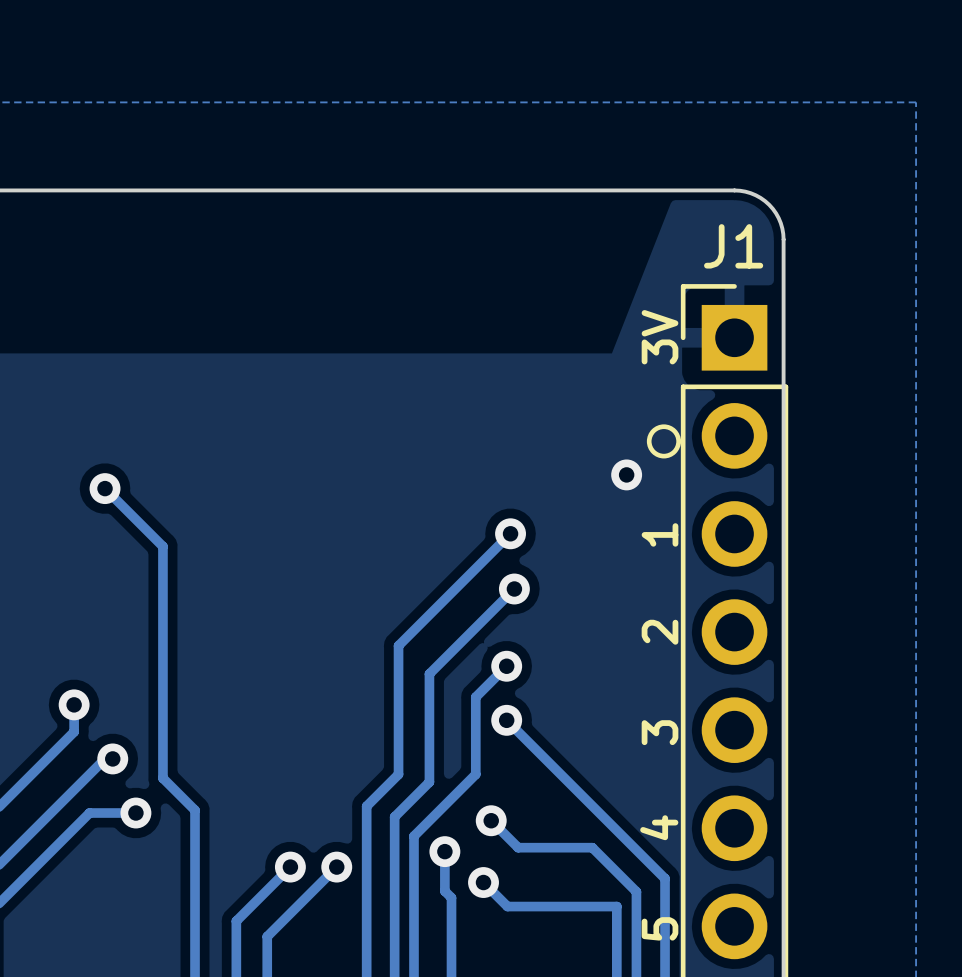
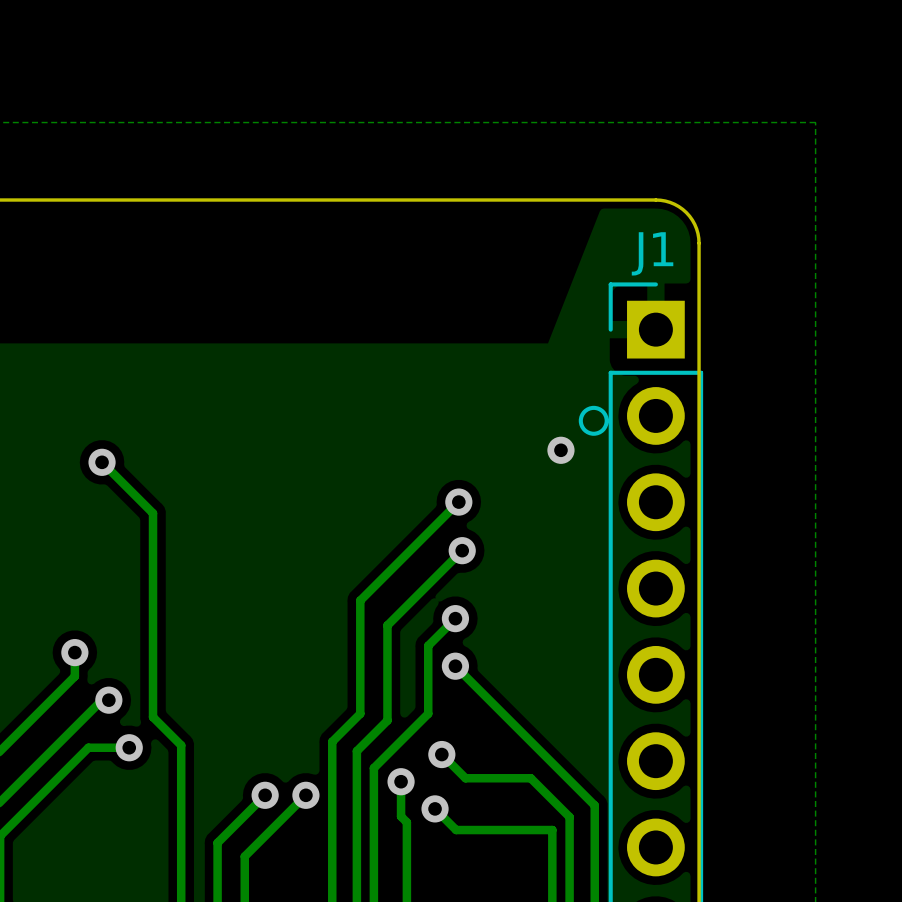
text: 3V (660, 337) -> none
text: 1 (660, 534) -> none
text: 2 (660, 632) -> none
text: 3 (660, 732) -> none
text: 4 (659, 827) -> none
text: 5 (660, 928) -> none

